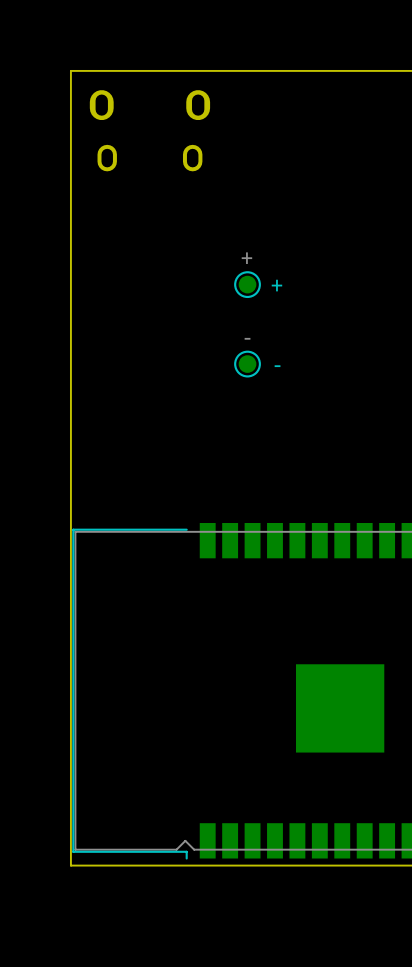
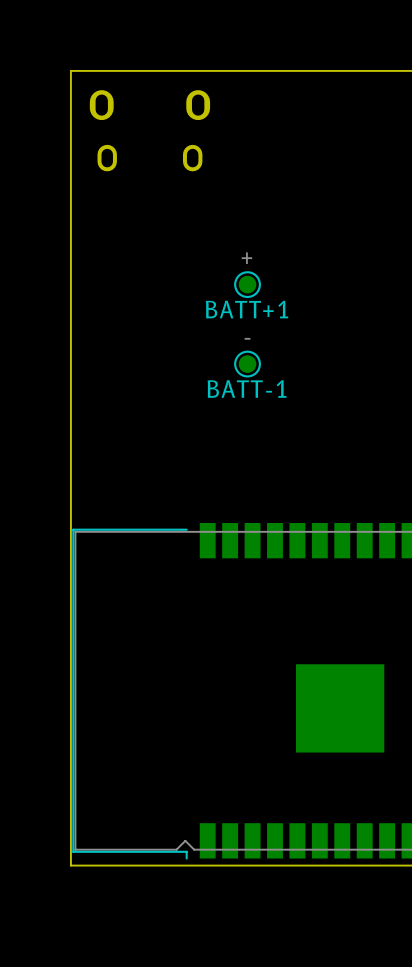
BATT+1 name: + (276, 285) -> BATT+1 (247, 309)
BATT-1 name: - (277, 366) -> BATT-1 (247, 388)

